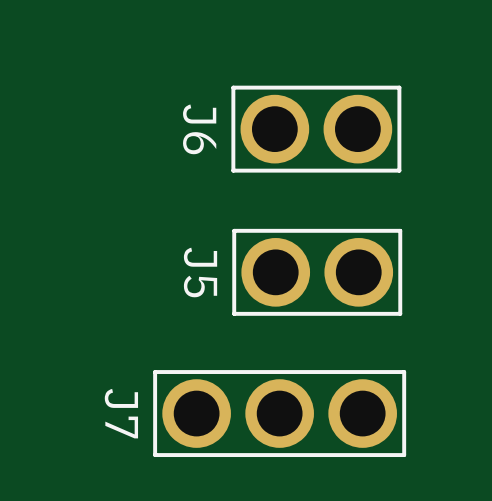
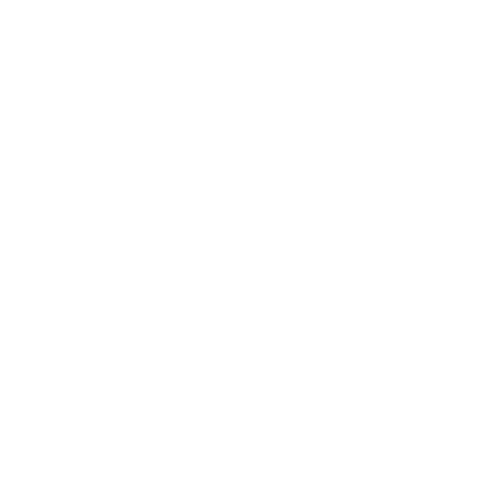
J6: (316, 129) -> none
J5: (317, 272) -> none
J7: (279, 413) -> none

